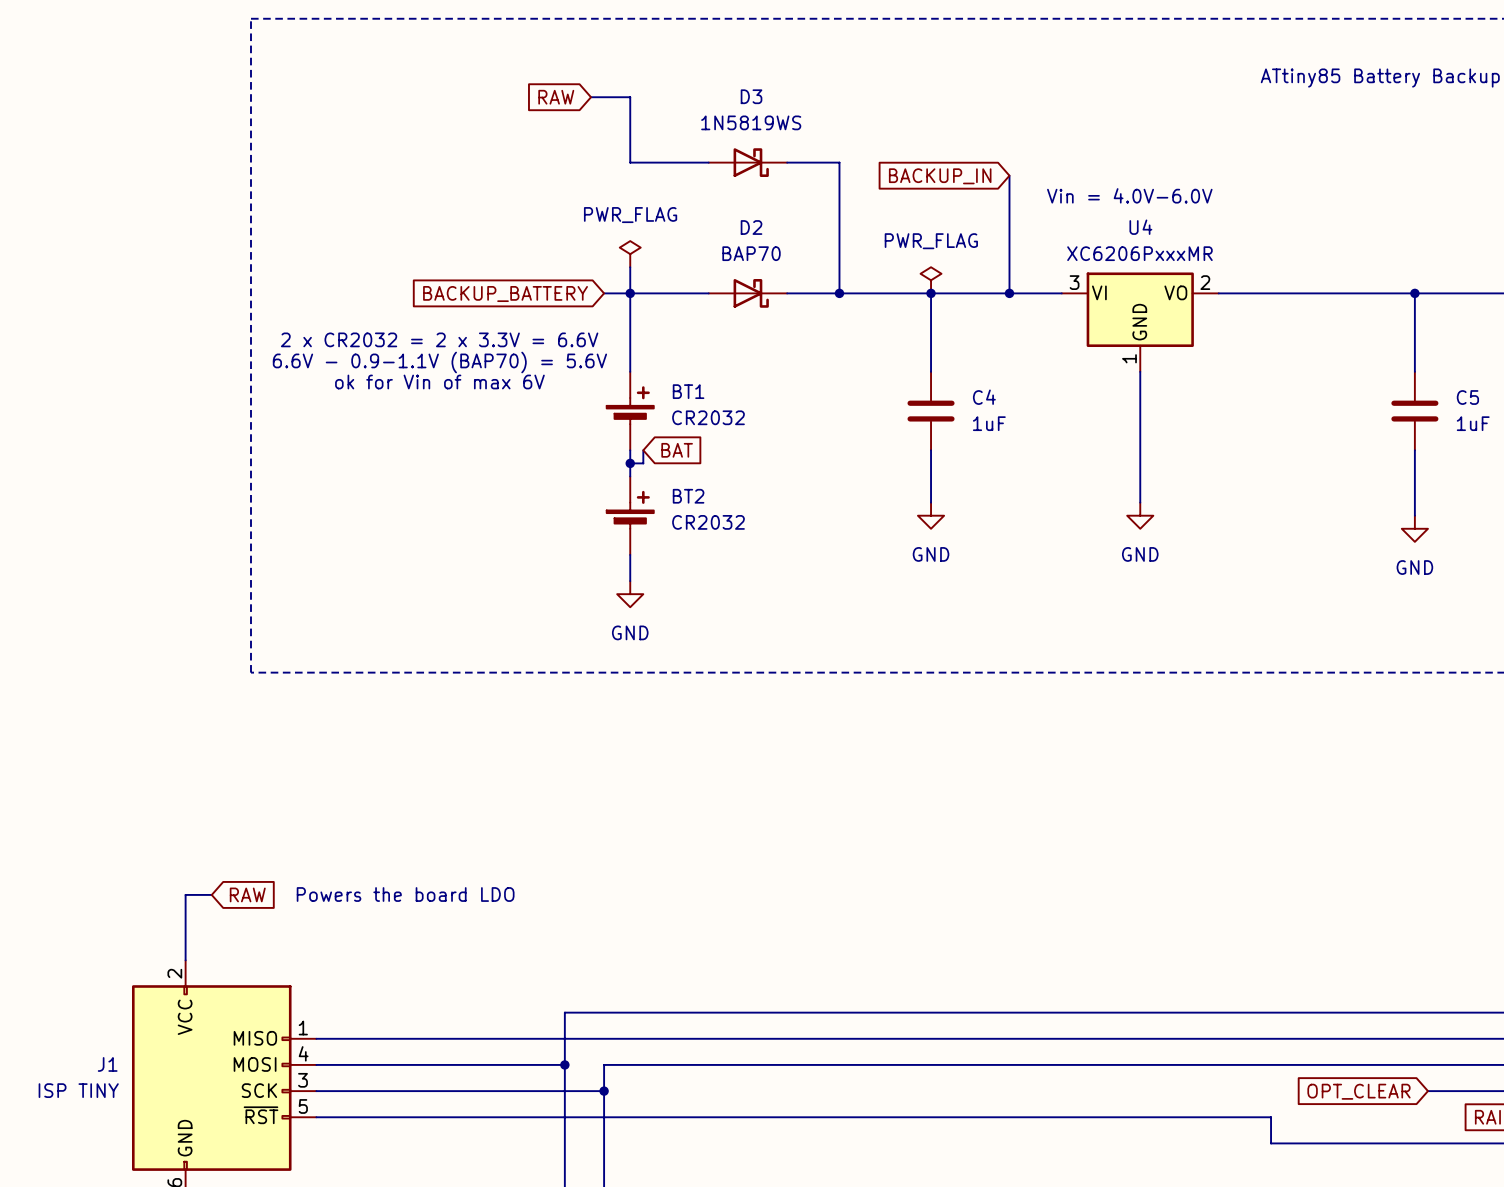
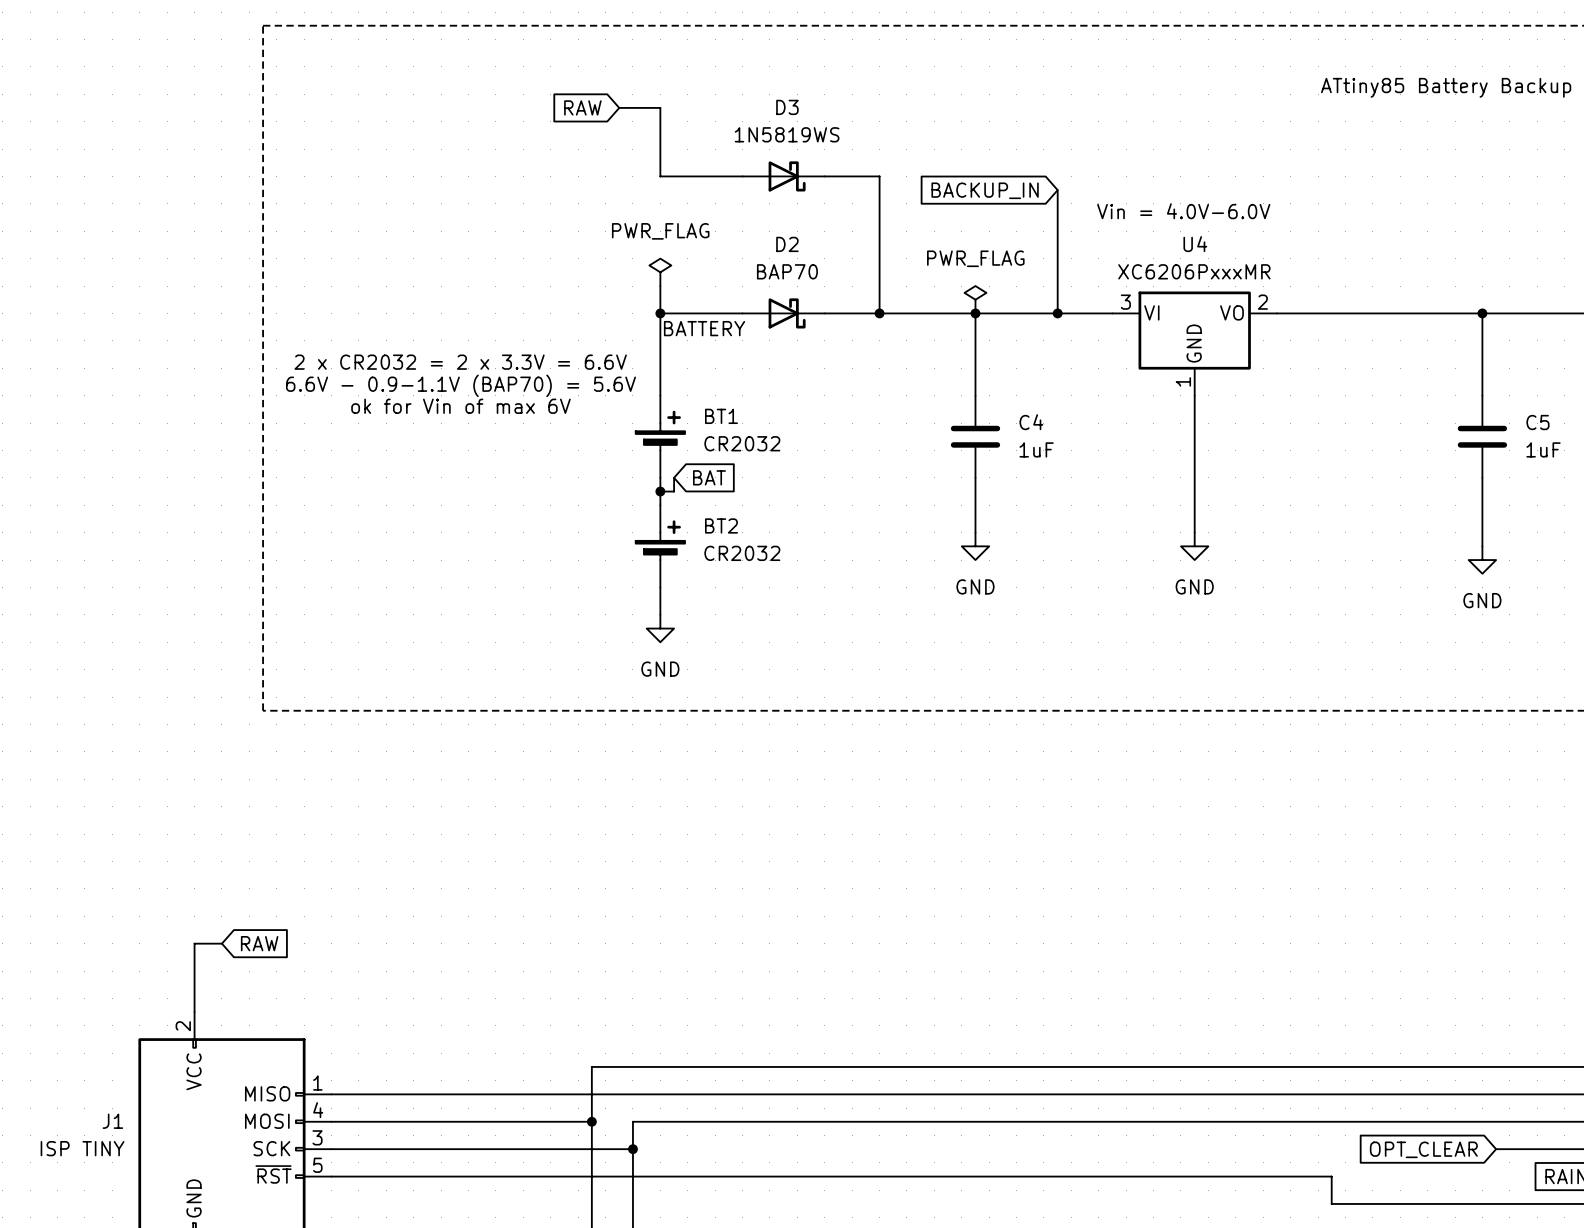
wire: (604, 293) (630, 293) -> none
global label: BACKUP_BATTERY (505, 294) -> none
label: none -> BATTERY (704, 328)
text: Powers the board LDO (405, 894) -> none

